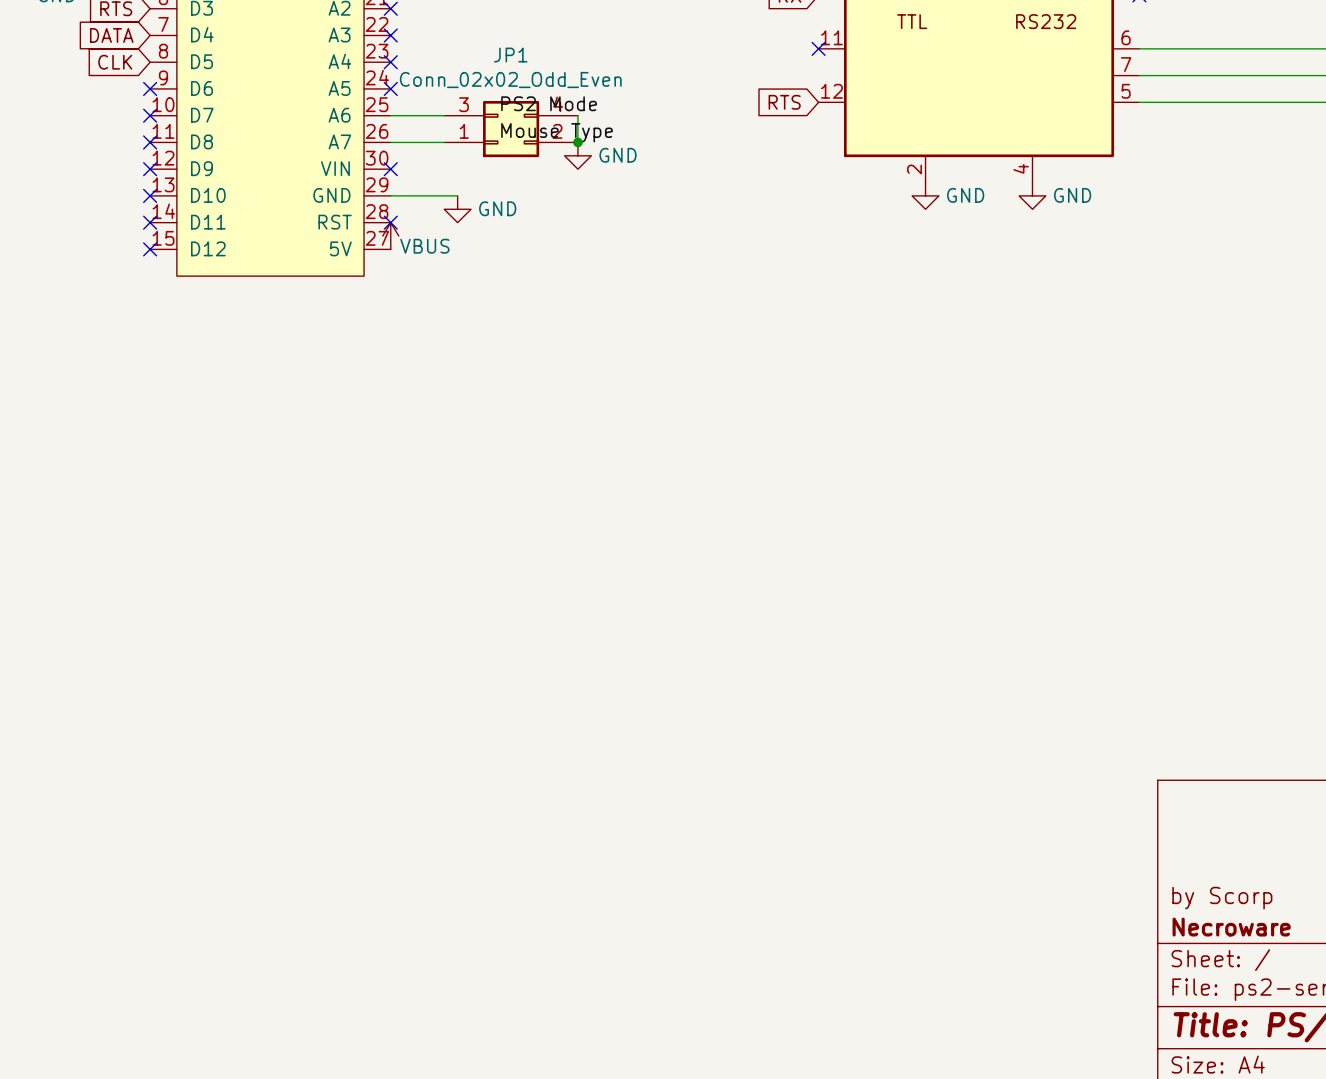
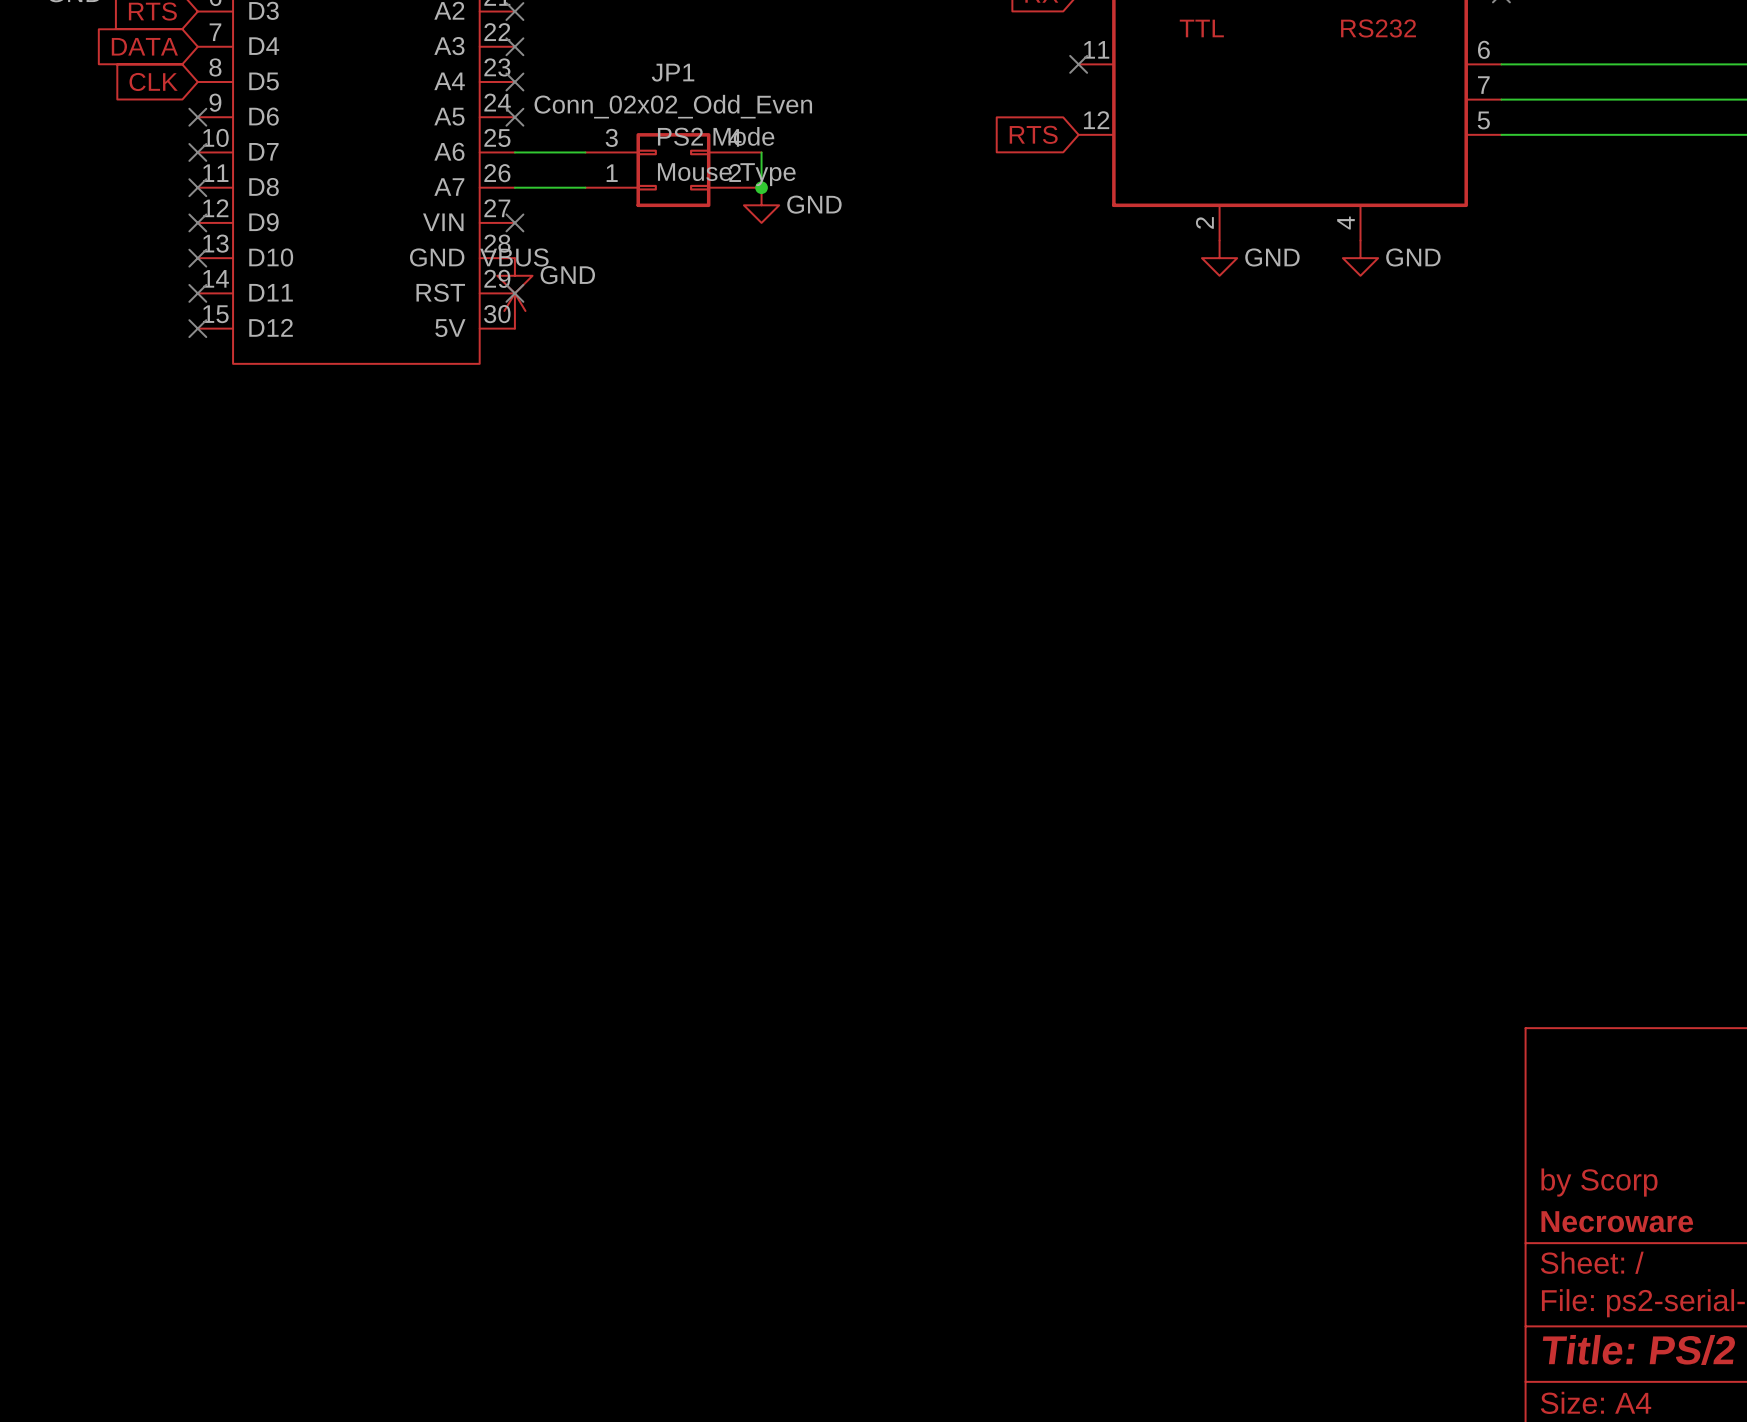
part pin number: 30 (377, 158) -> 27 (497, 208)
part pin number: 29 (377, 184) -> 28 (497, 243)
wire: (390, 195) (457, 195) -> none
power symbol position: GND (457, 209) -> GND (514, 275)
part pin number: 28 (377, 211) -> 29 (497, 278)
part pin number: 27 (377, 238) -> 30 (497, 314)
power symbol text position: VBUS (424, 246) -> VBUS (514, 257)

